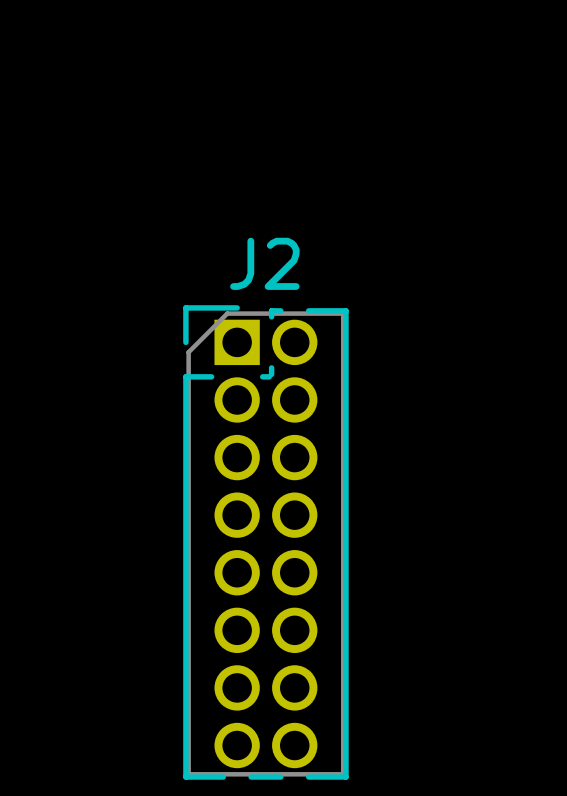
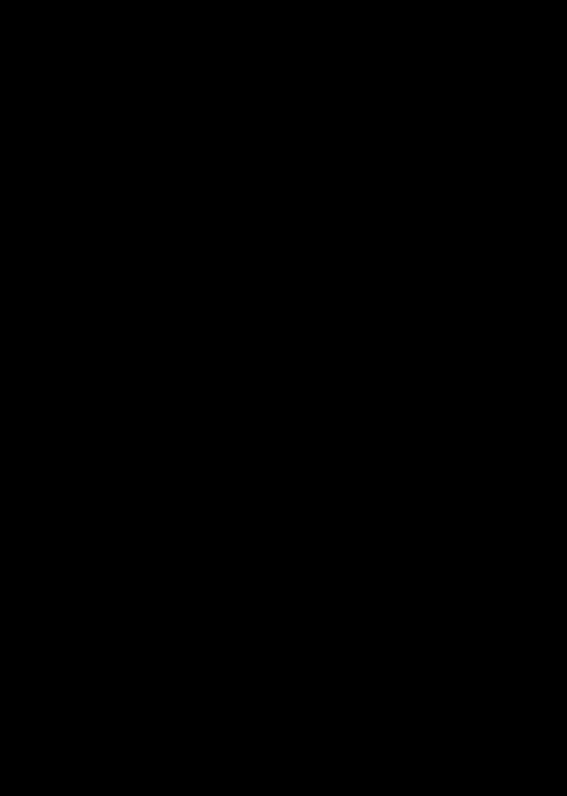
J2: (265, 542) -> none

